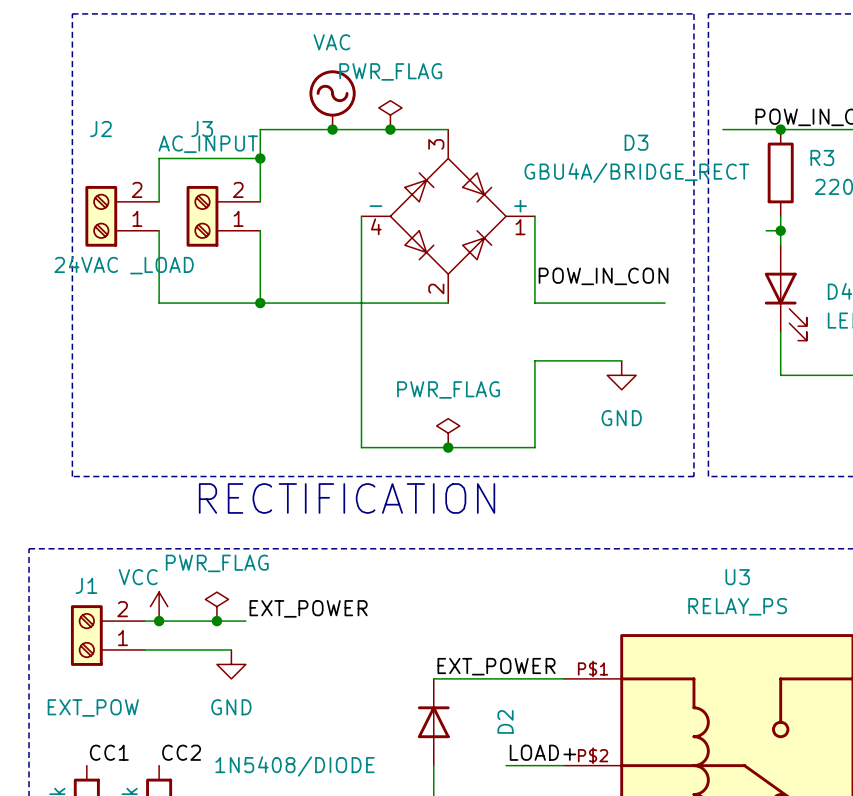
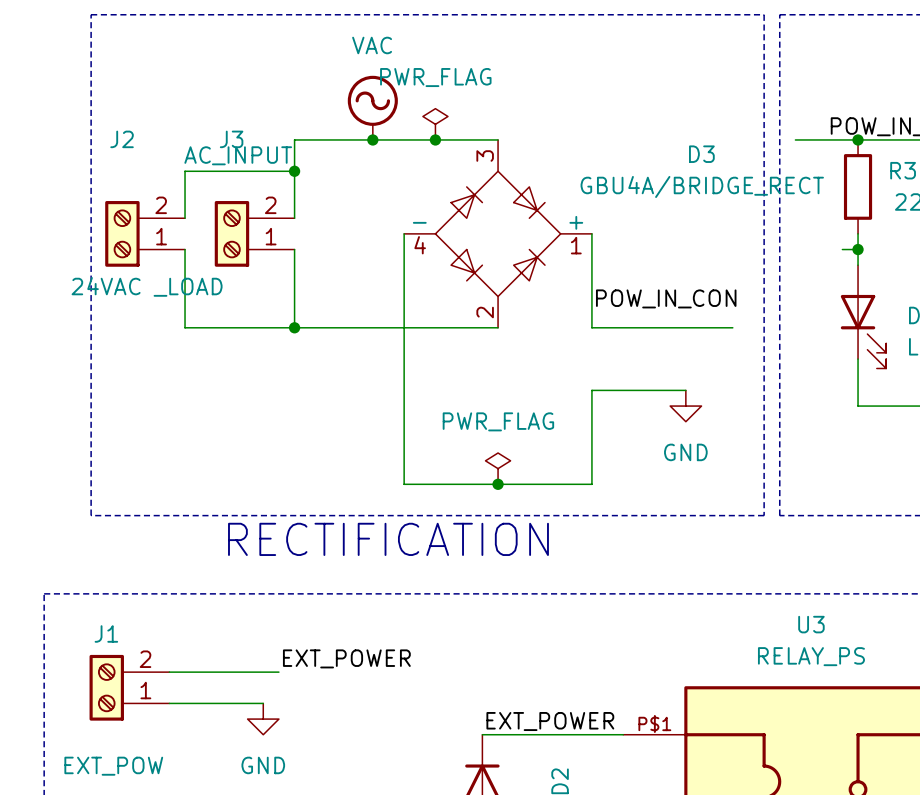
power symbol: VCC (159, 606) -> none
power symbol: PWR_FLAG (216, 606) -> none
junction: (159, 621) -> none
junction: (216, 621) -> none

